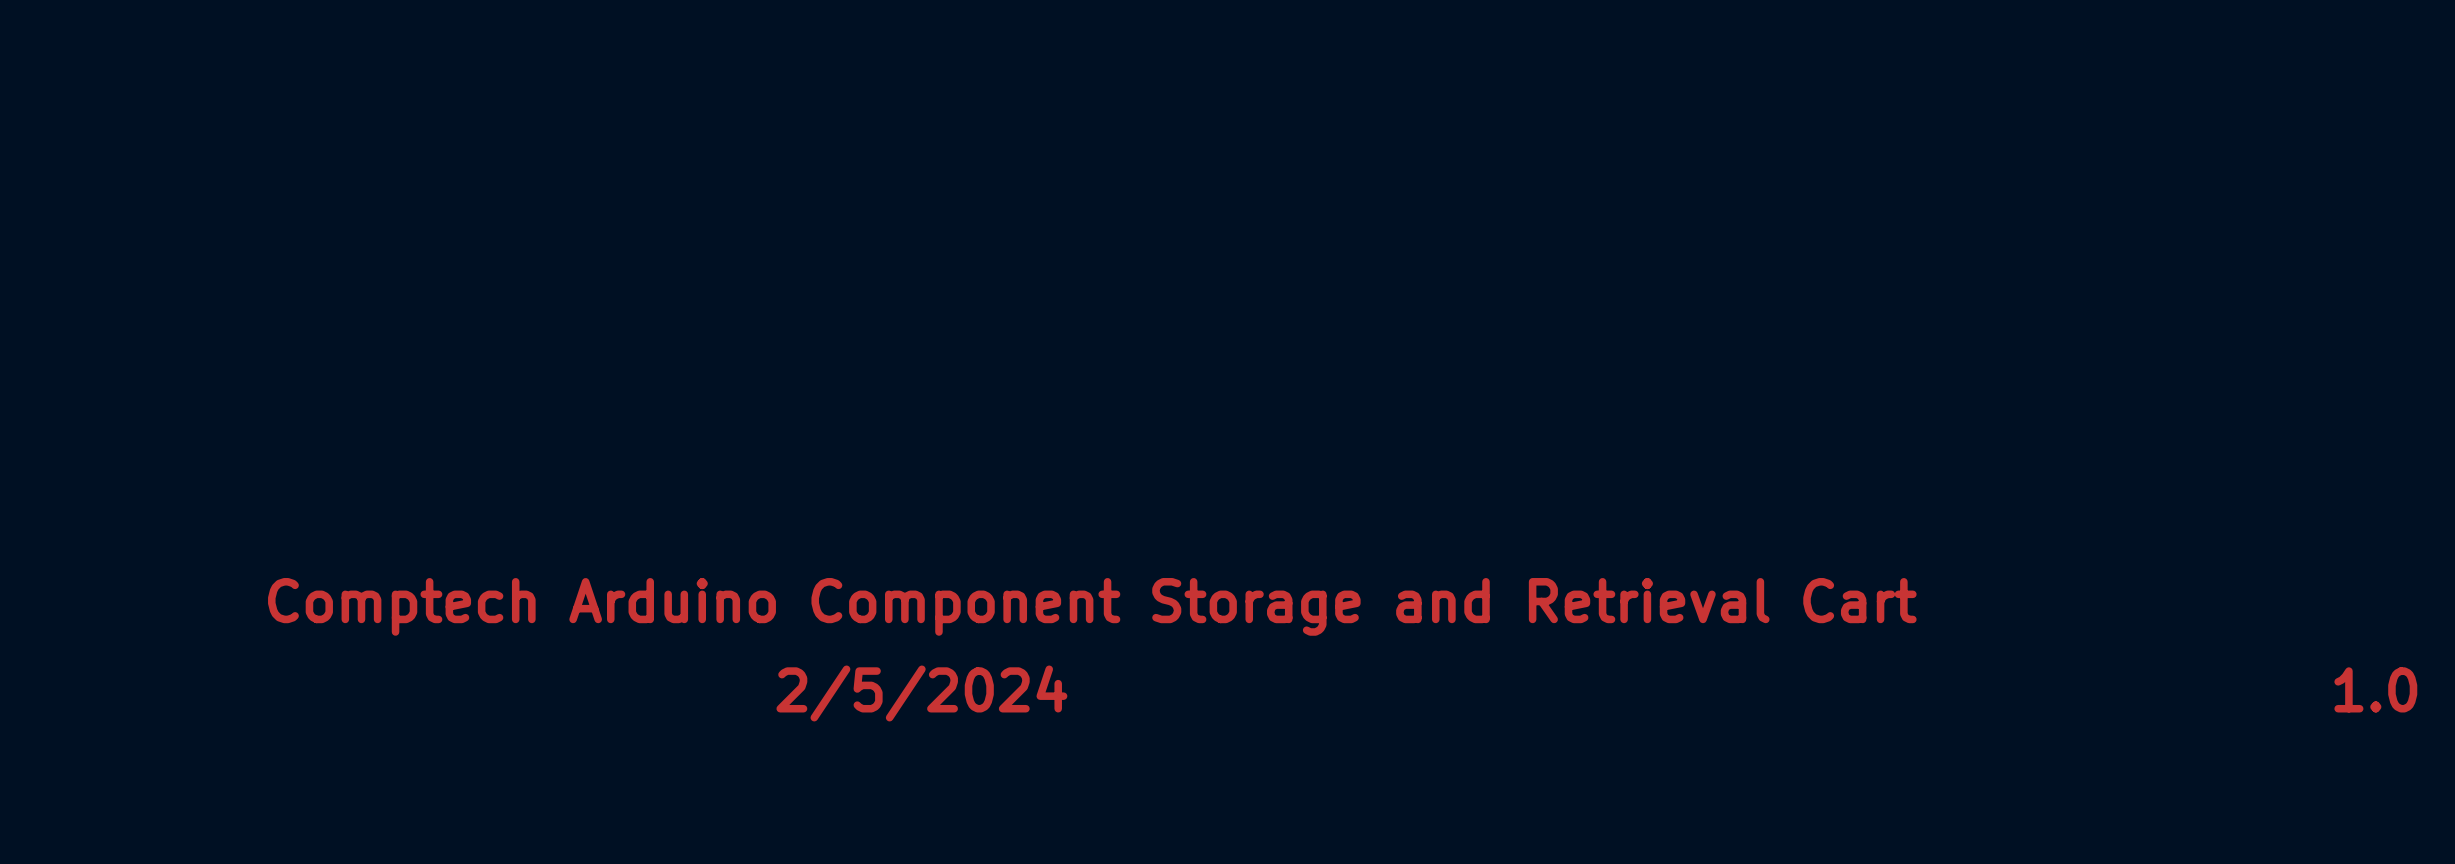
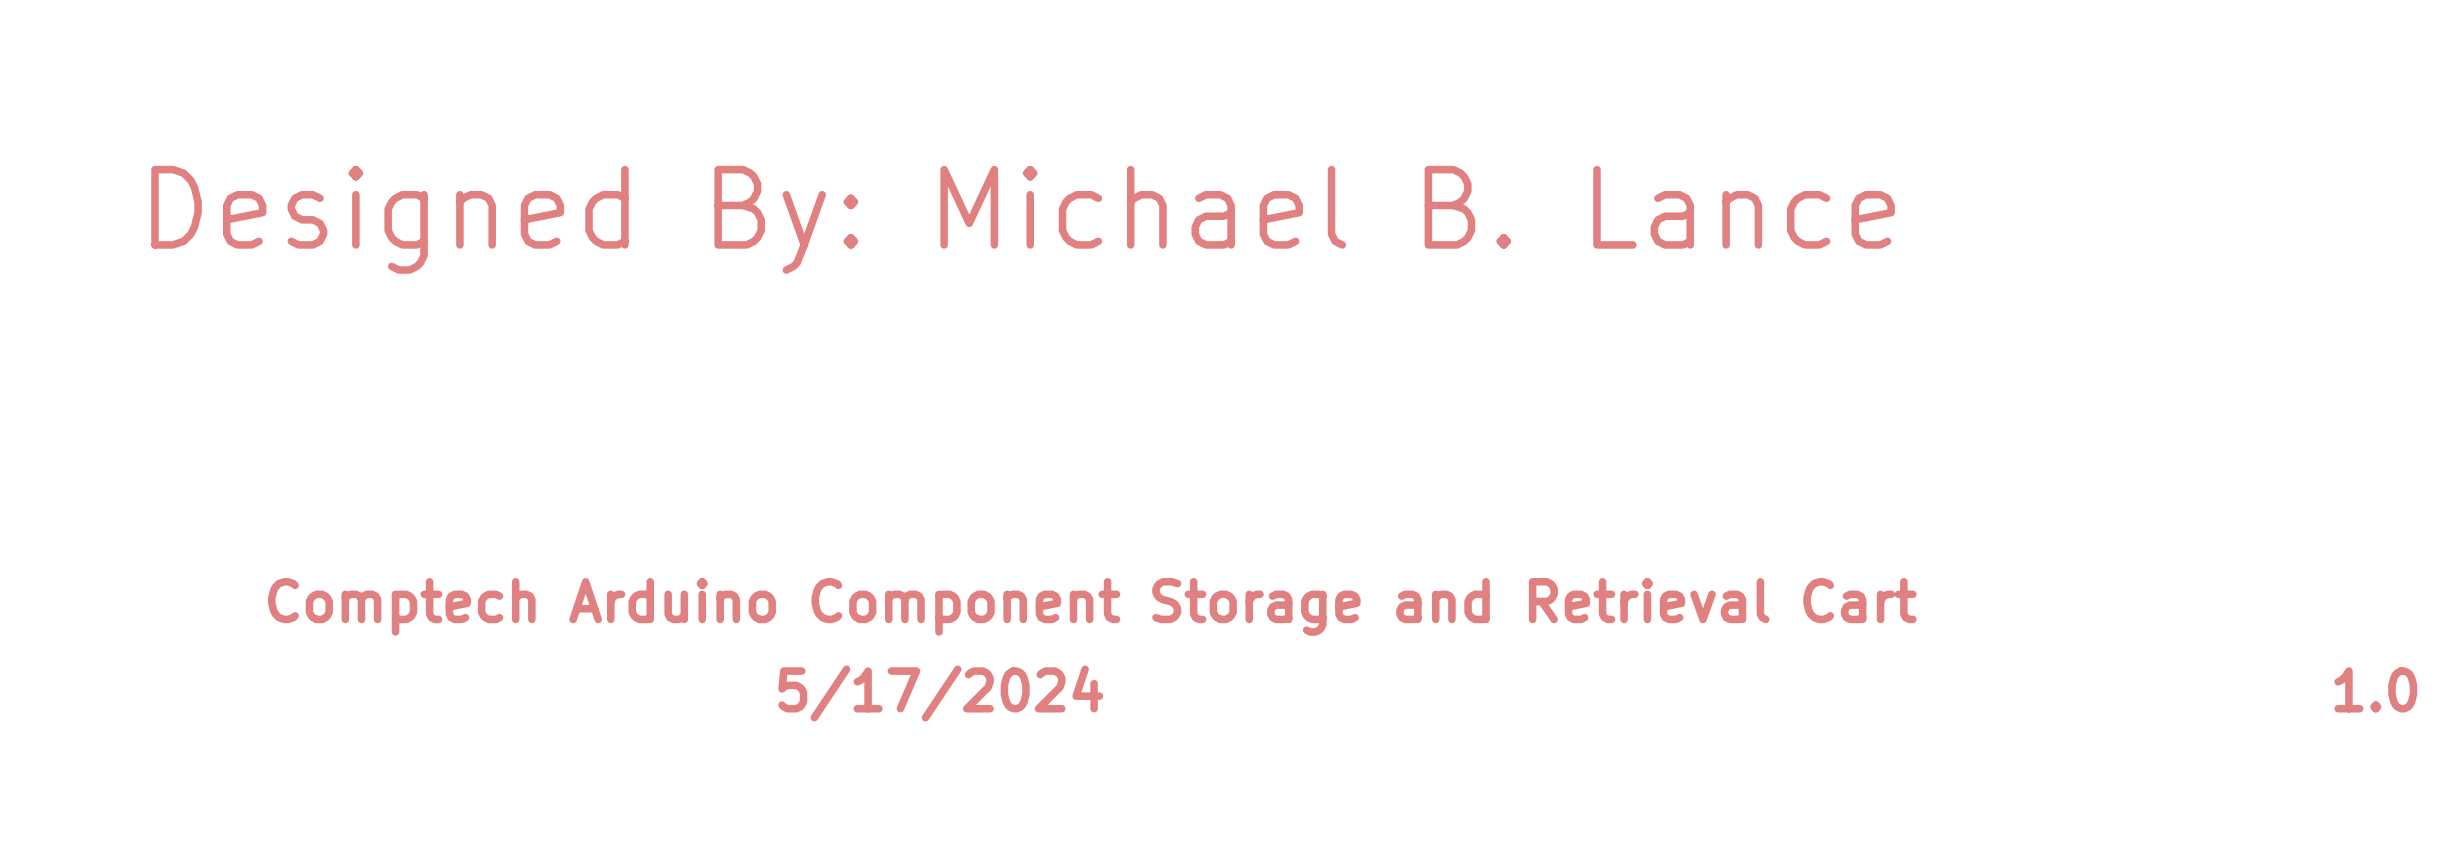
text: none -> Designed By: Michael B. Lance (1023, 219)
text: 2/5/2024 (921, 693) -> 5/17/2024 (940, 693)

